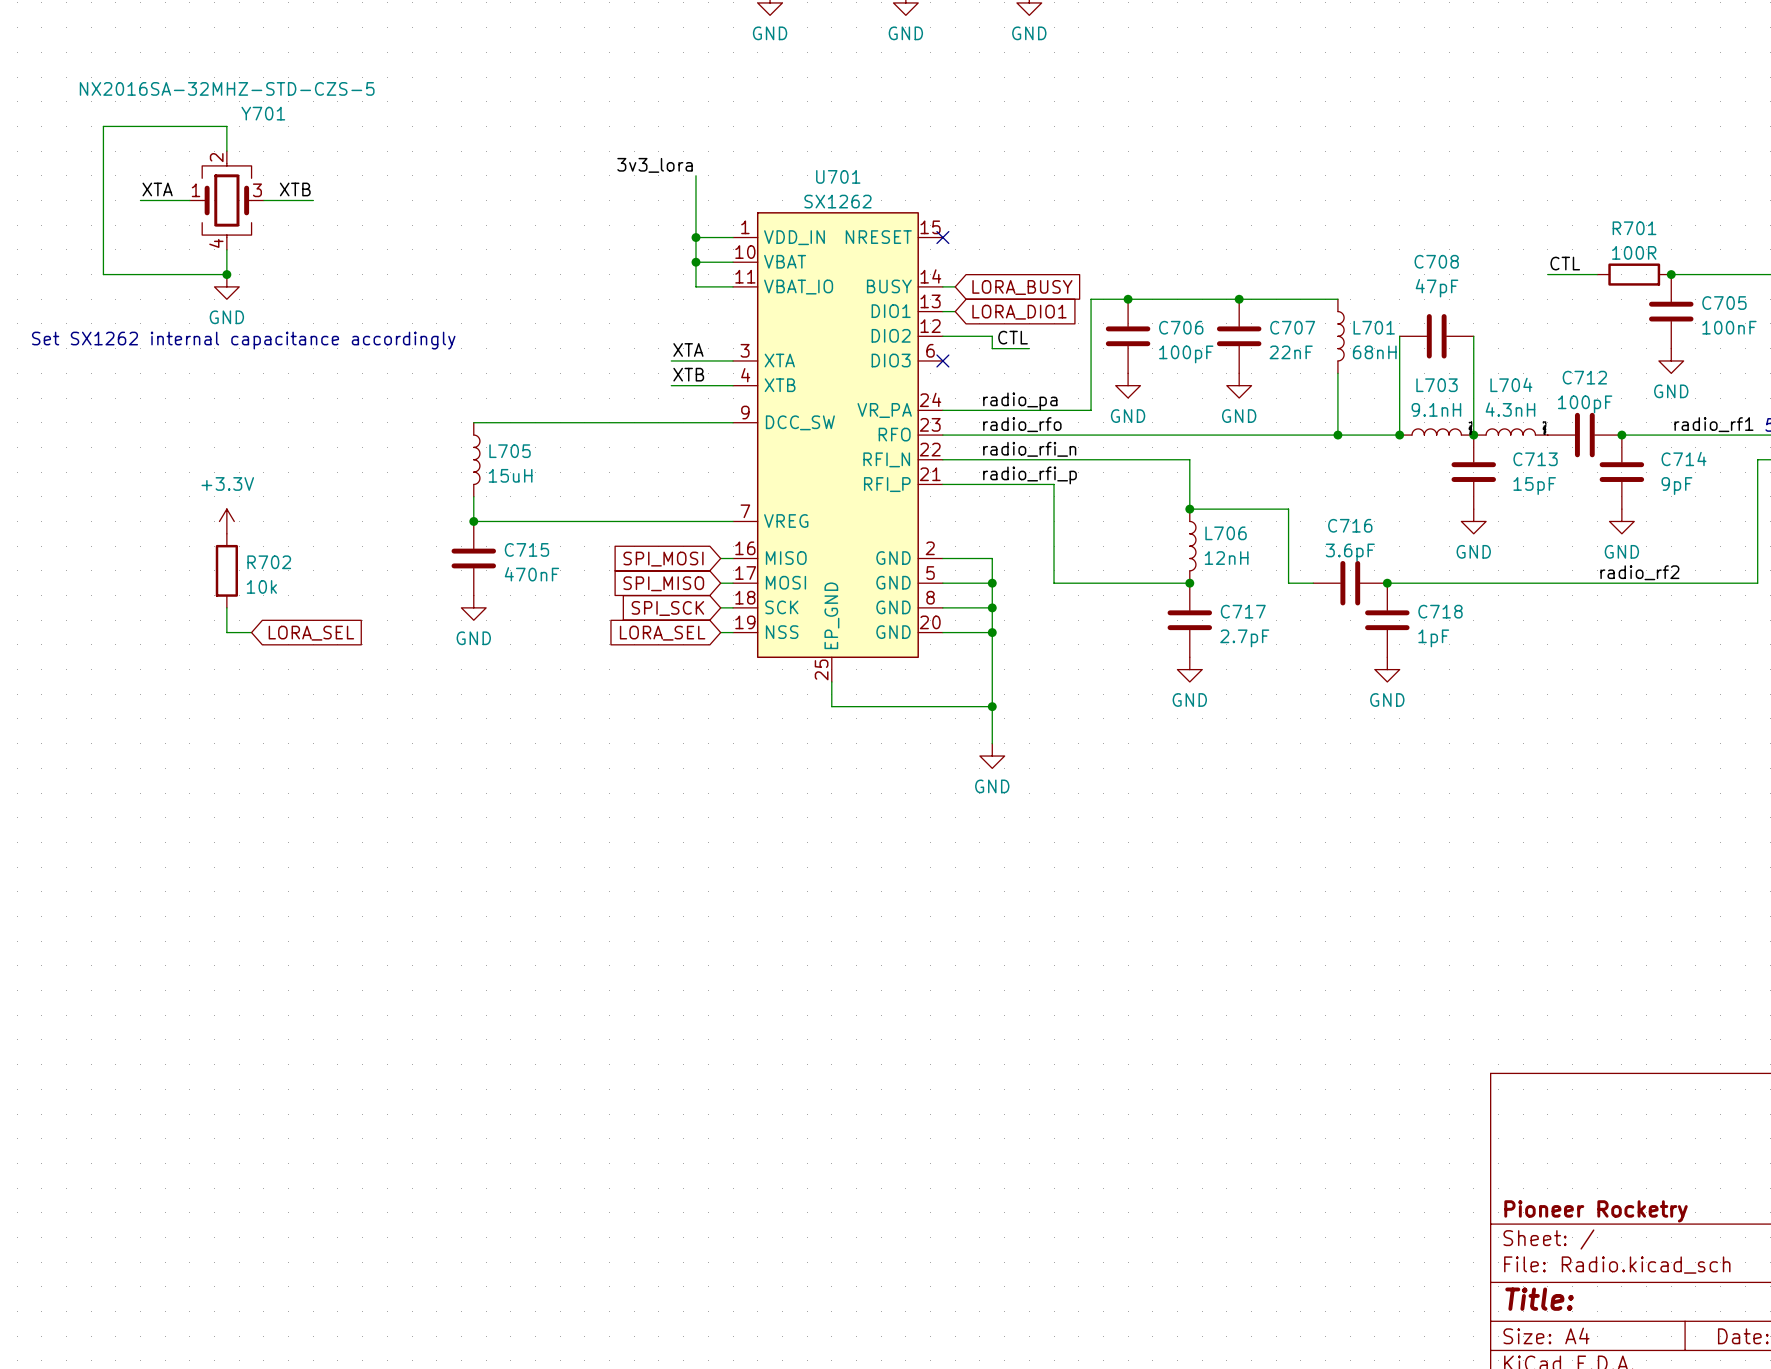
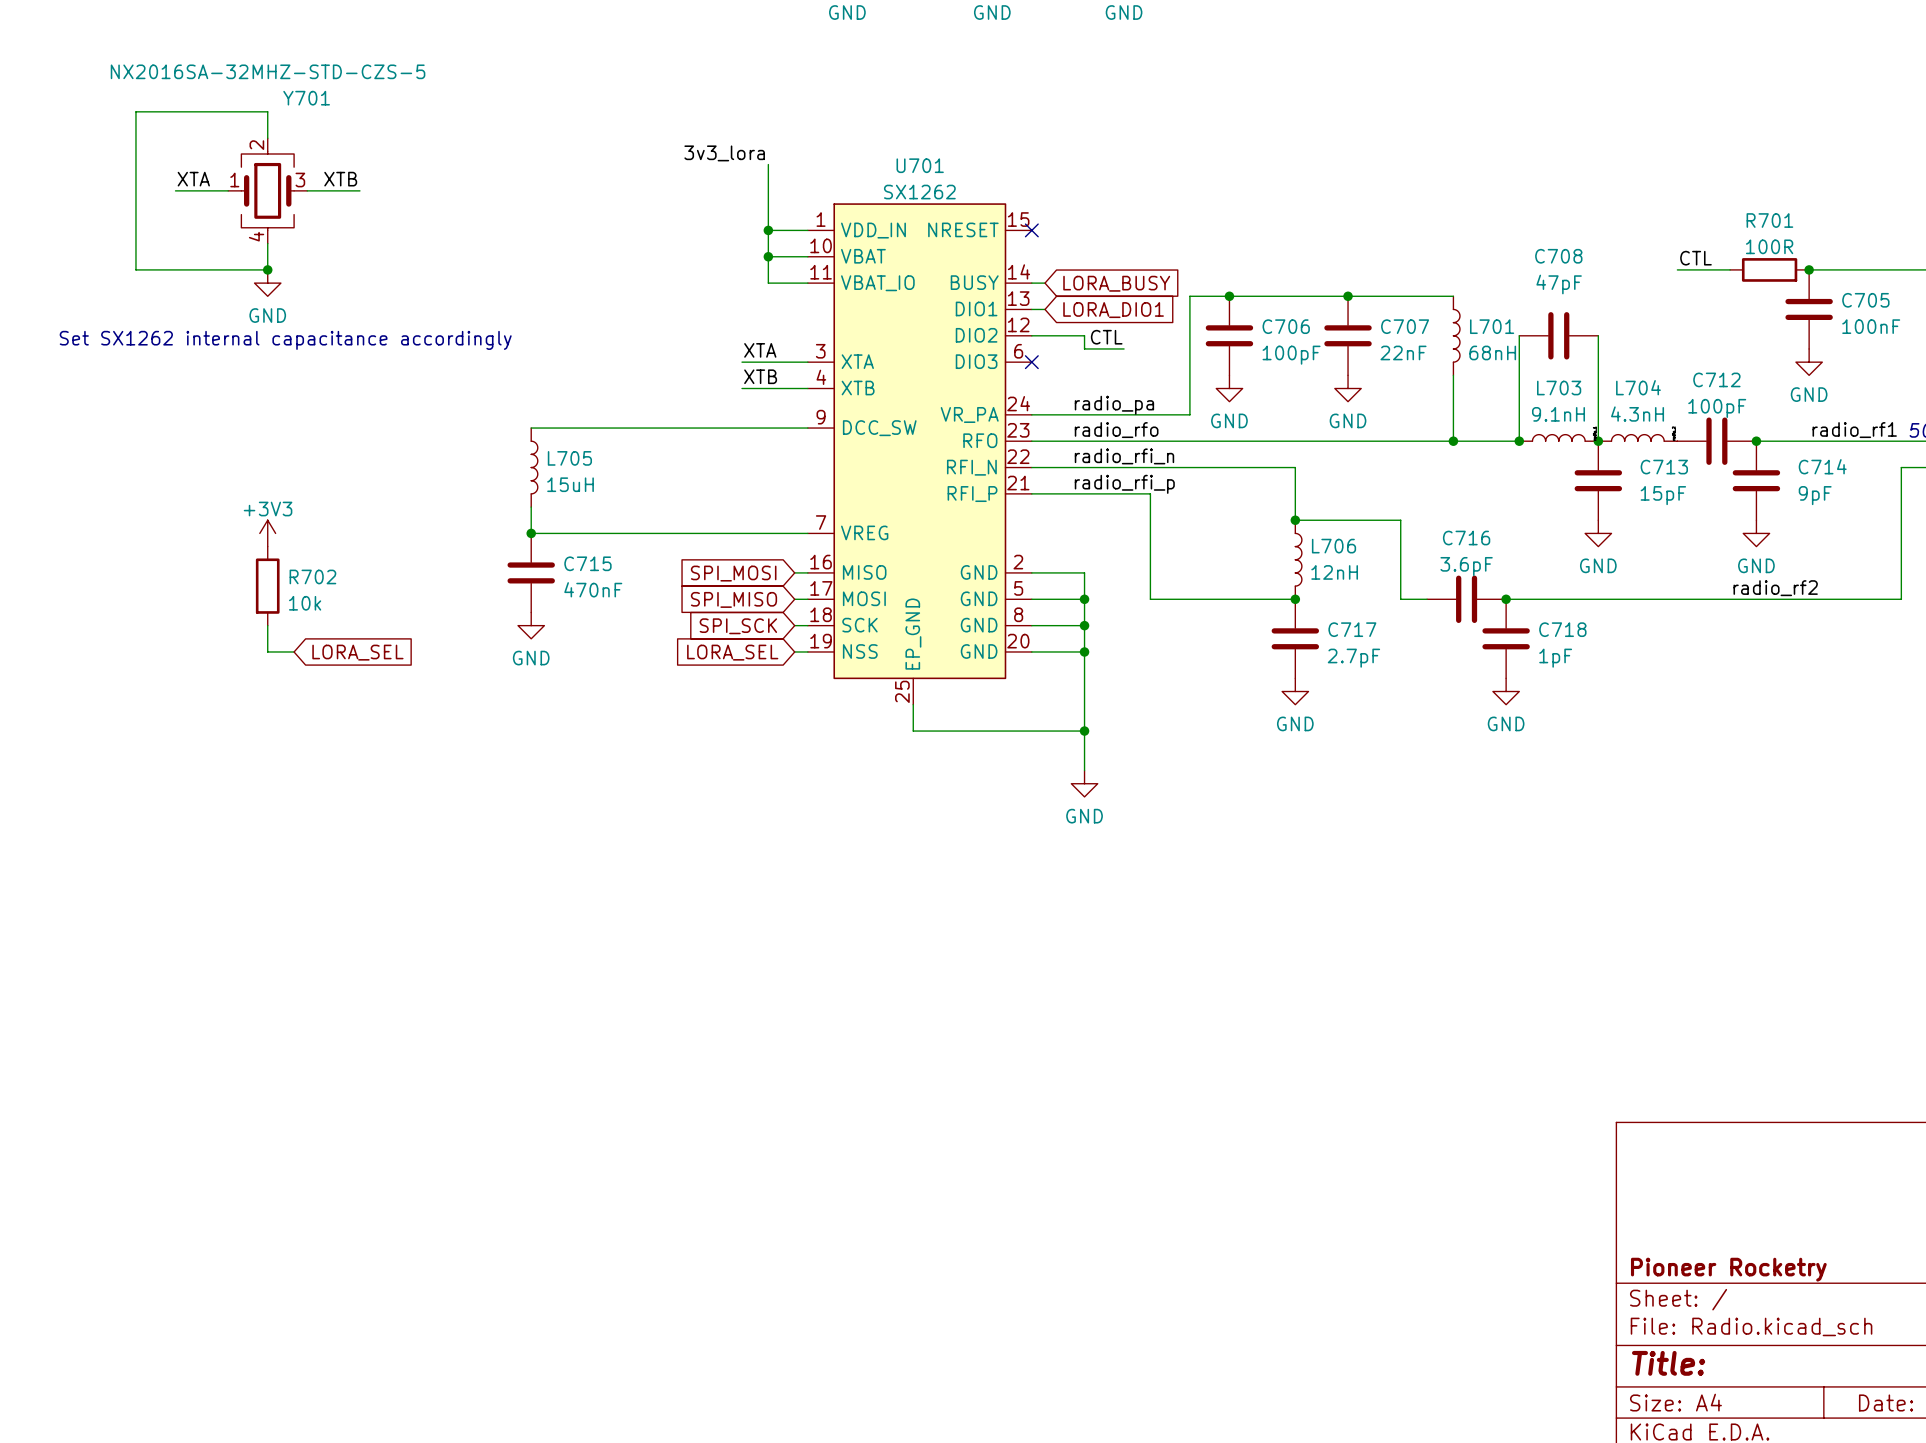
power symbol: +3.3V (226, 521) -> +3V3 (267, 533)

